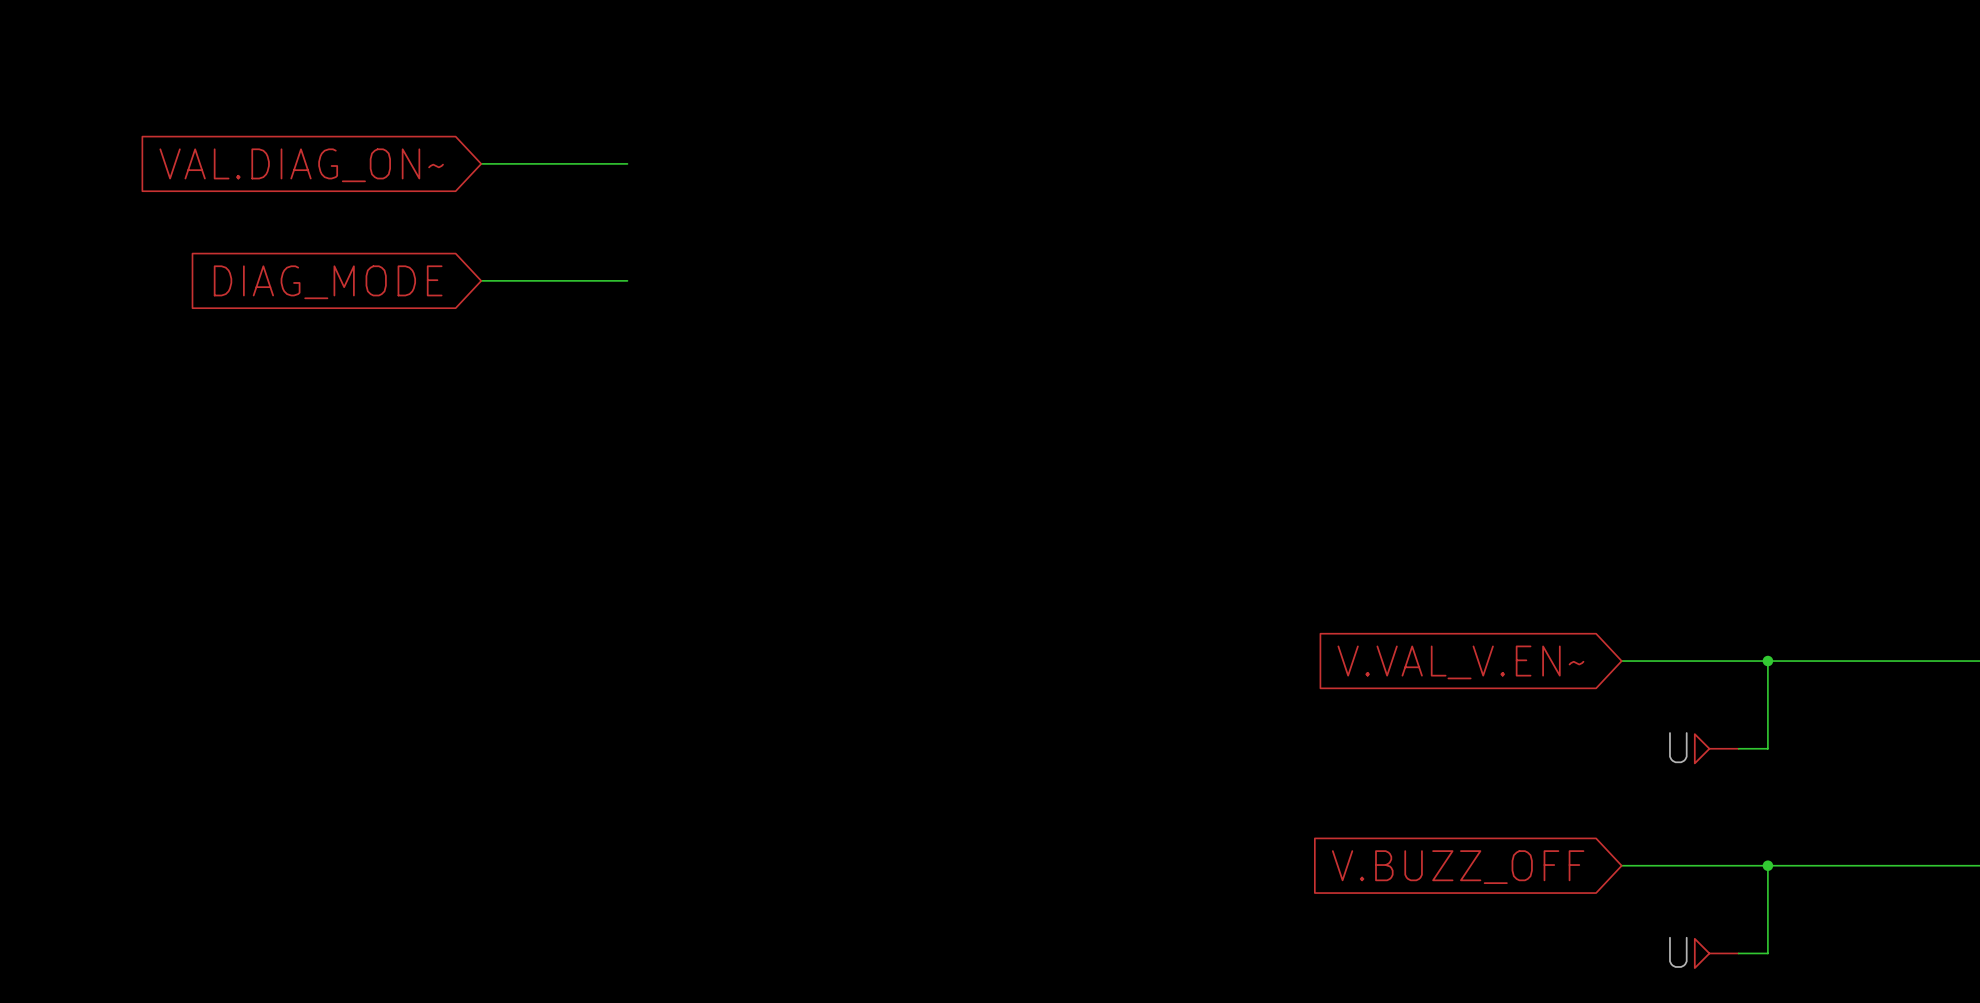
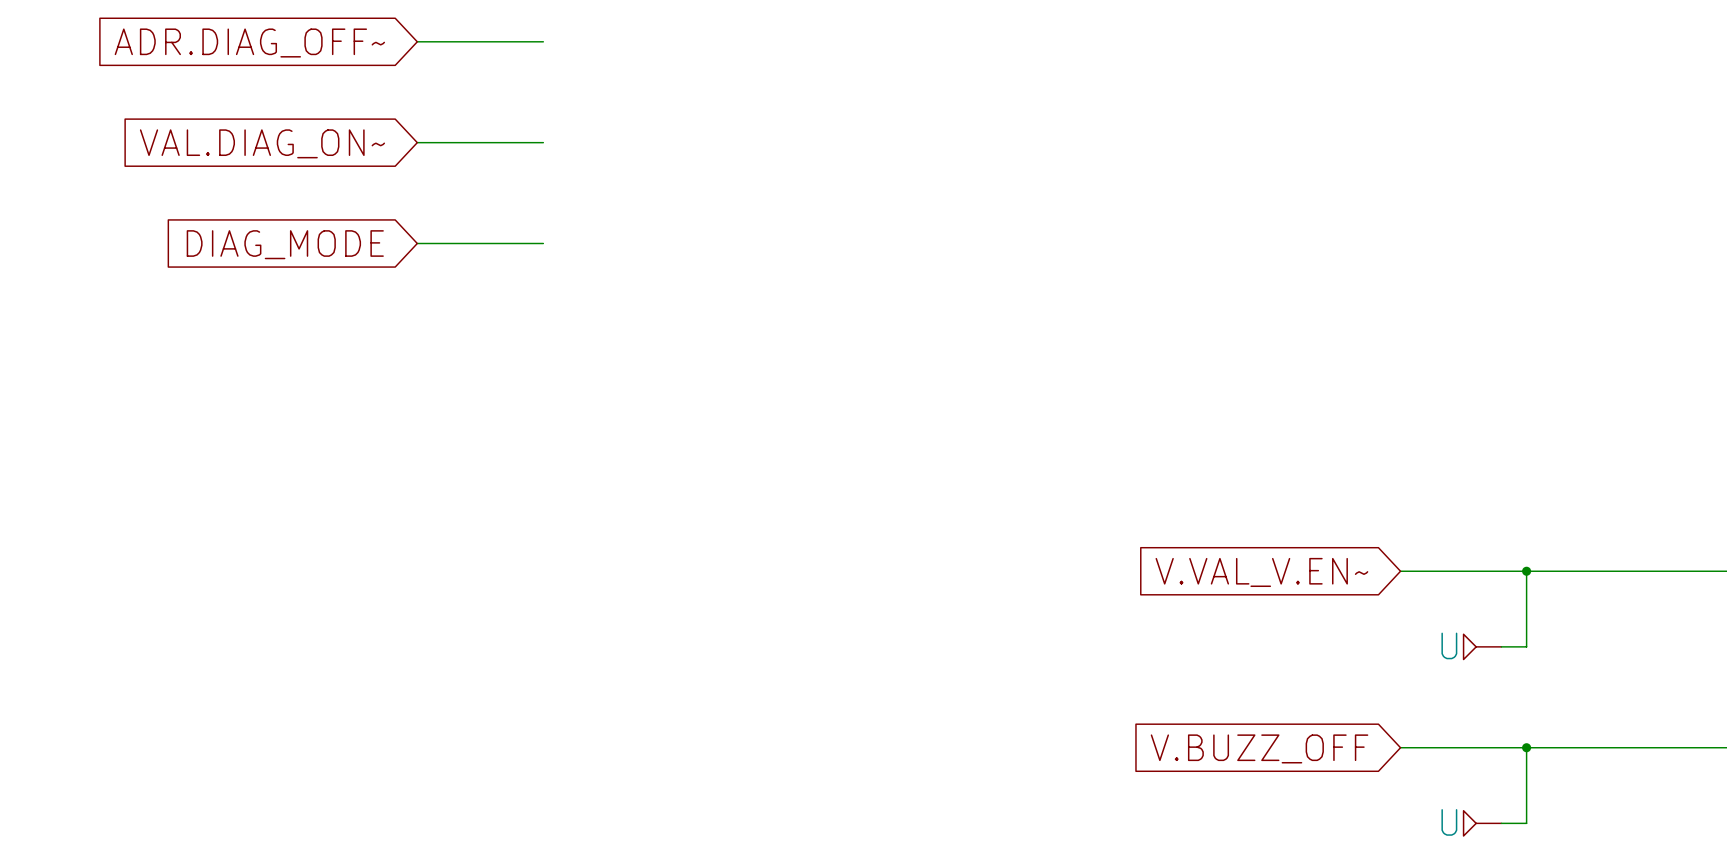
wire: none -> (417, 41) (543, 41)
global label: none -> ADR.DIAG_OFF~ (249, 43)

